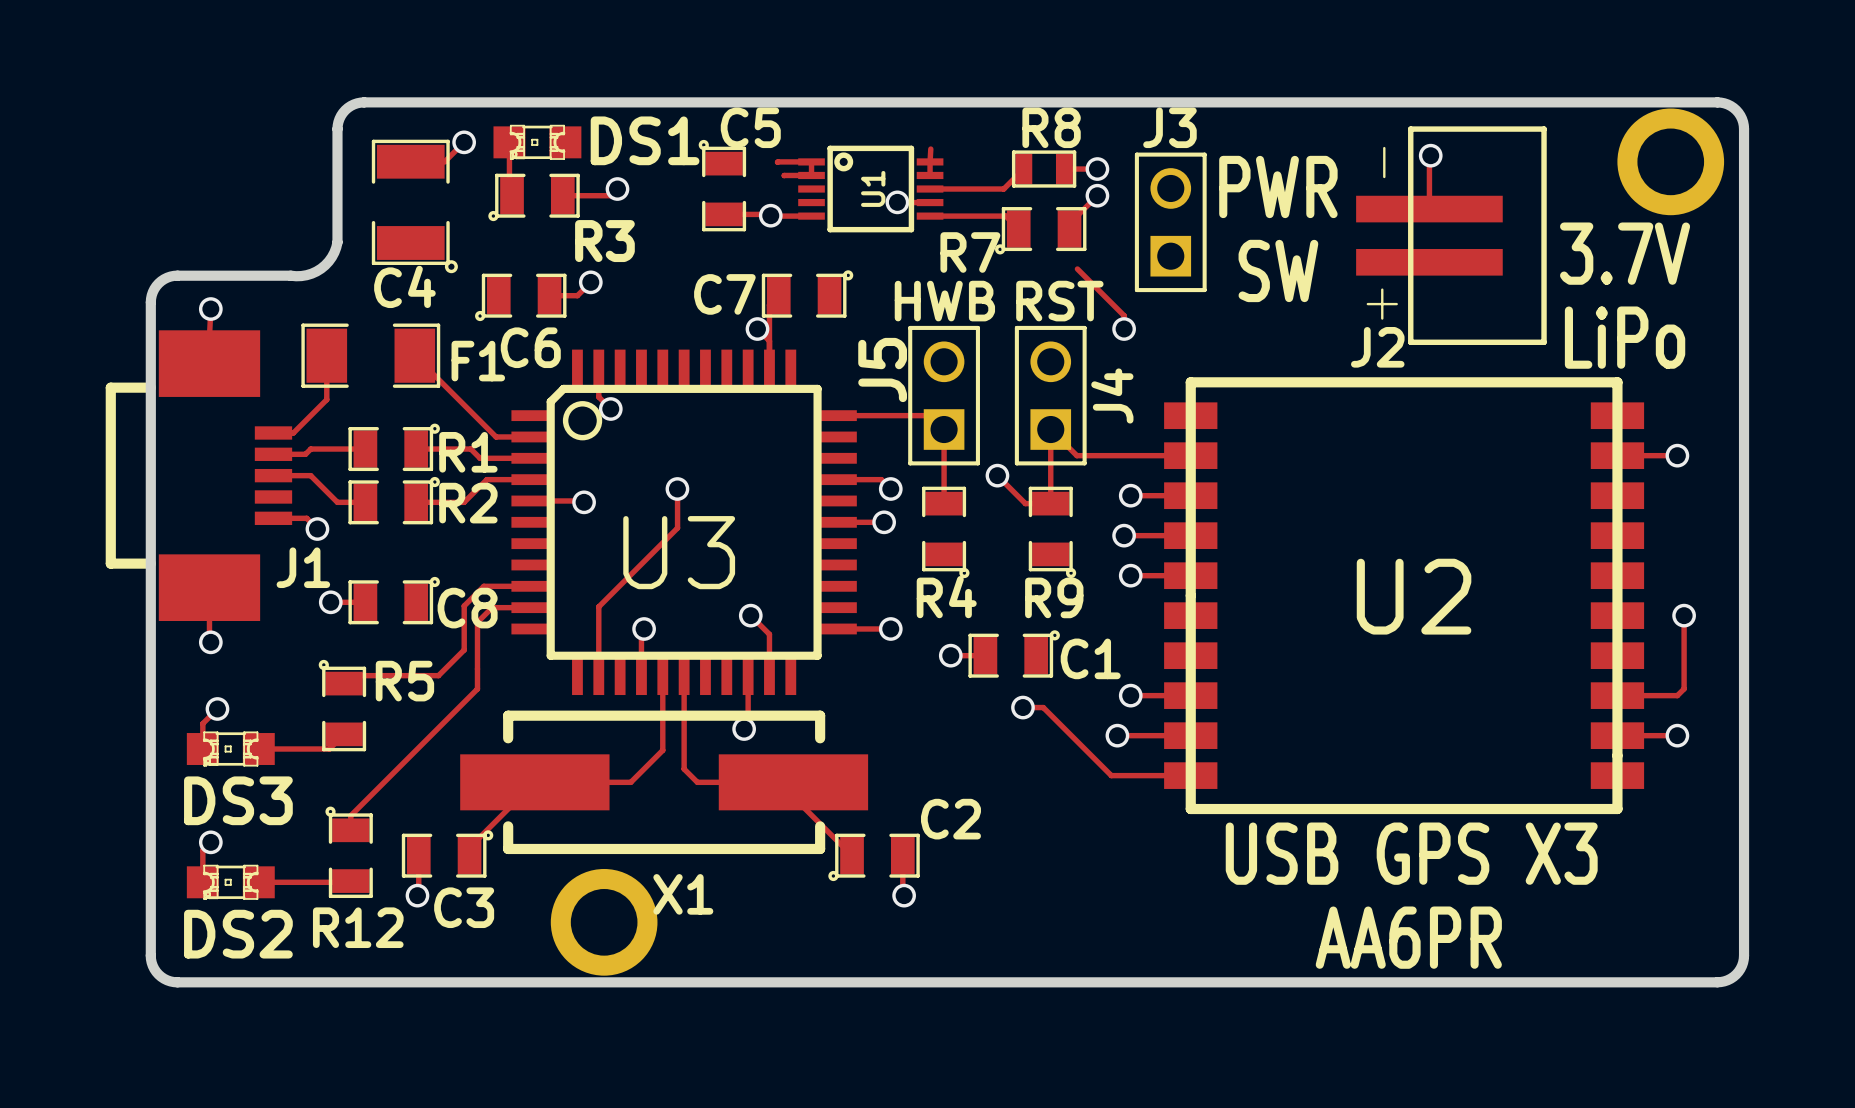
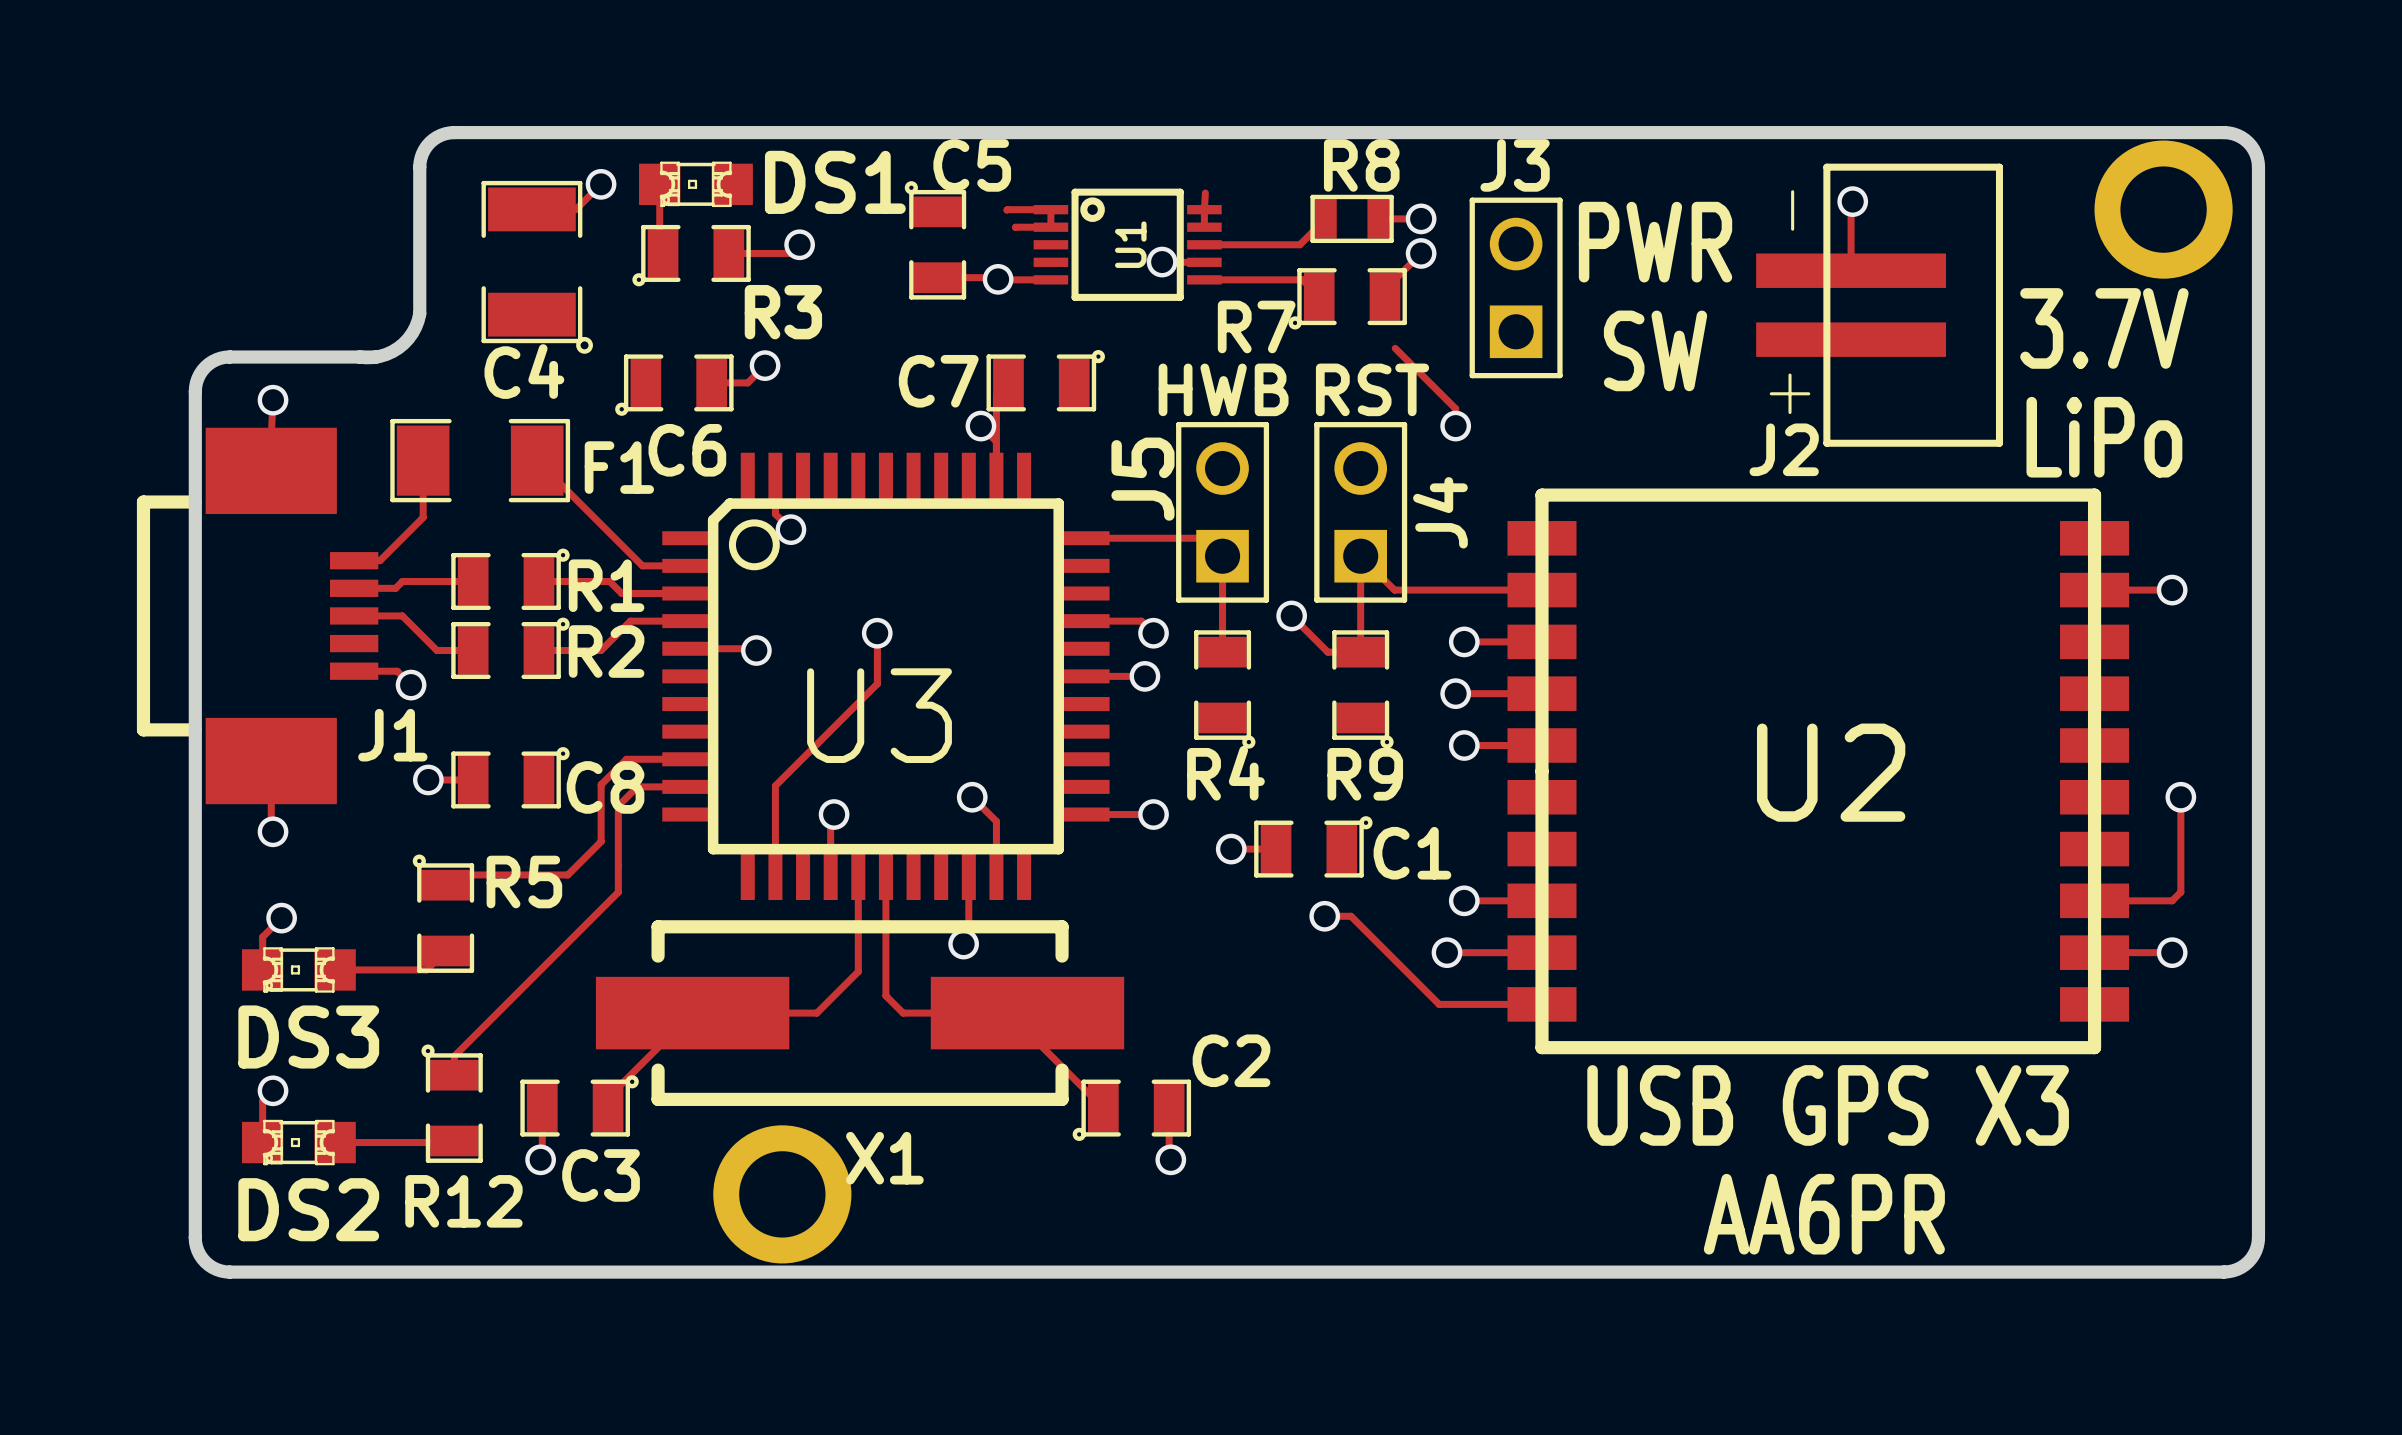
board edge: (364, 102) (347, 107) (341, 115) (337, 125) (337, 242) (334, 252) (328, 261) (316, 271) (306, 275) (290, 275) -> (471, 132) (449, 132) (437, 137) (426, 146) (420, 158) (419, 313) (415, 326) (403, 343) (392, 351) (379, 356) (359, 357)

